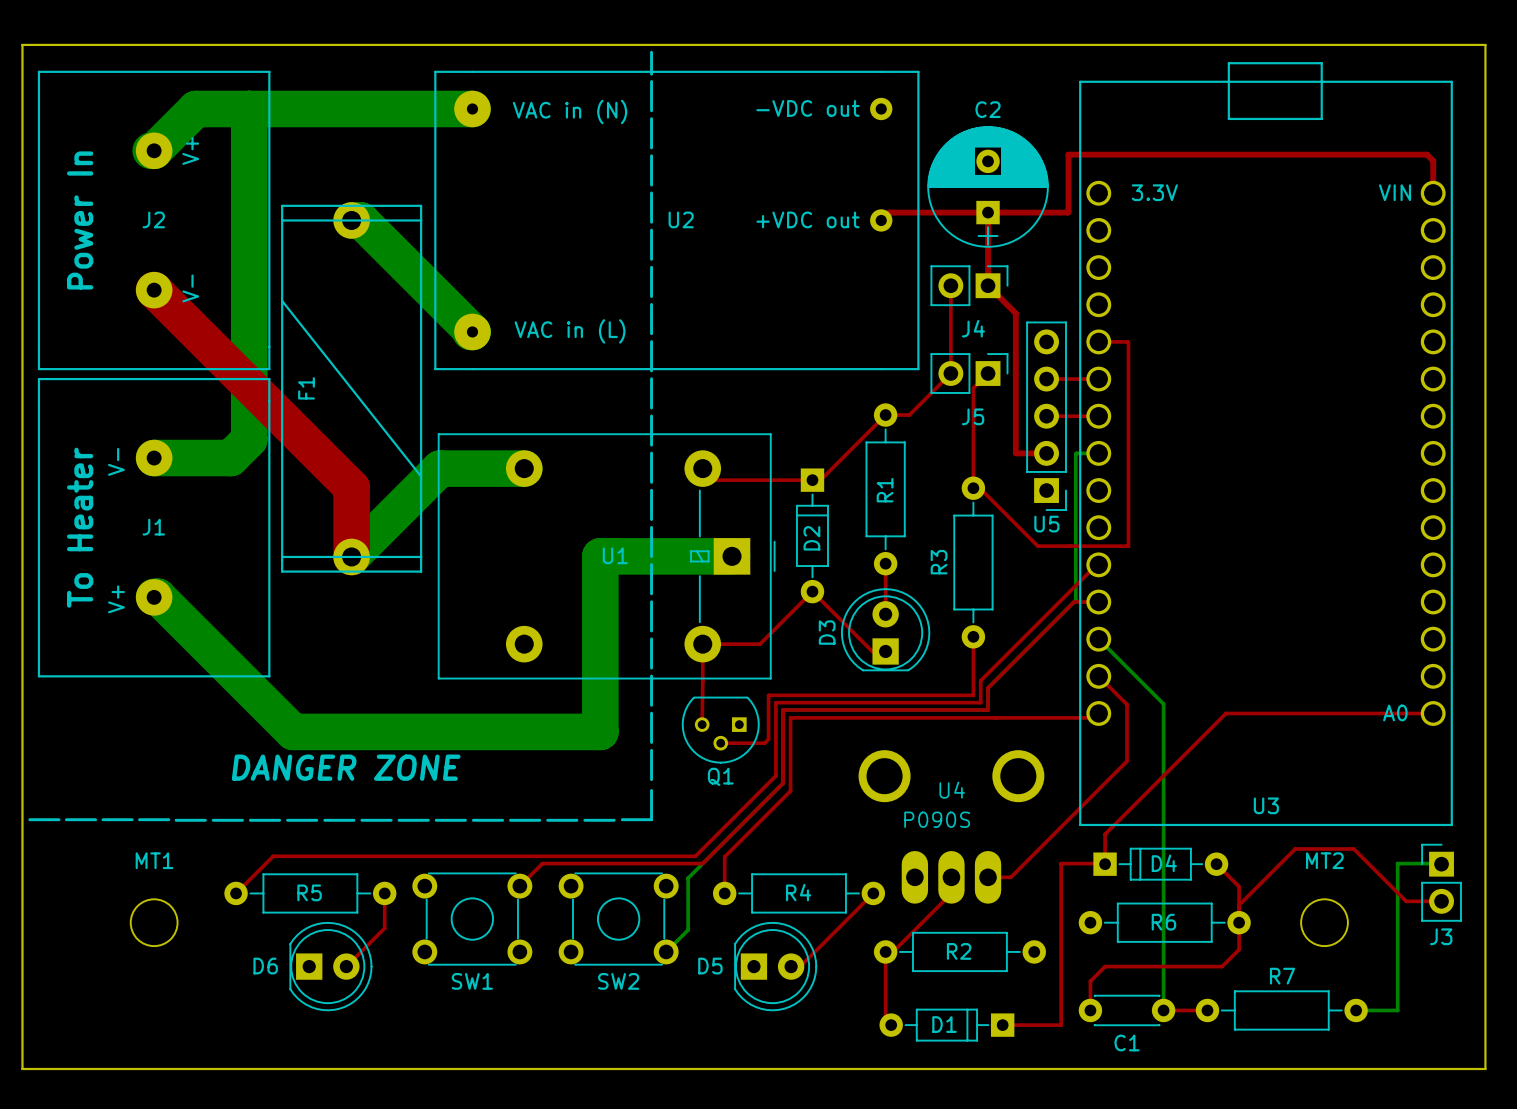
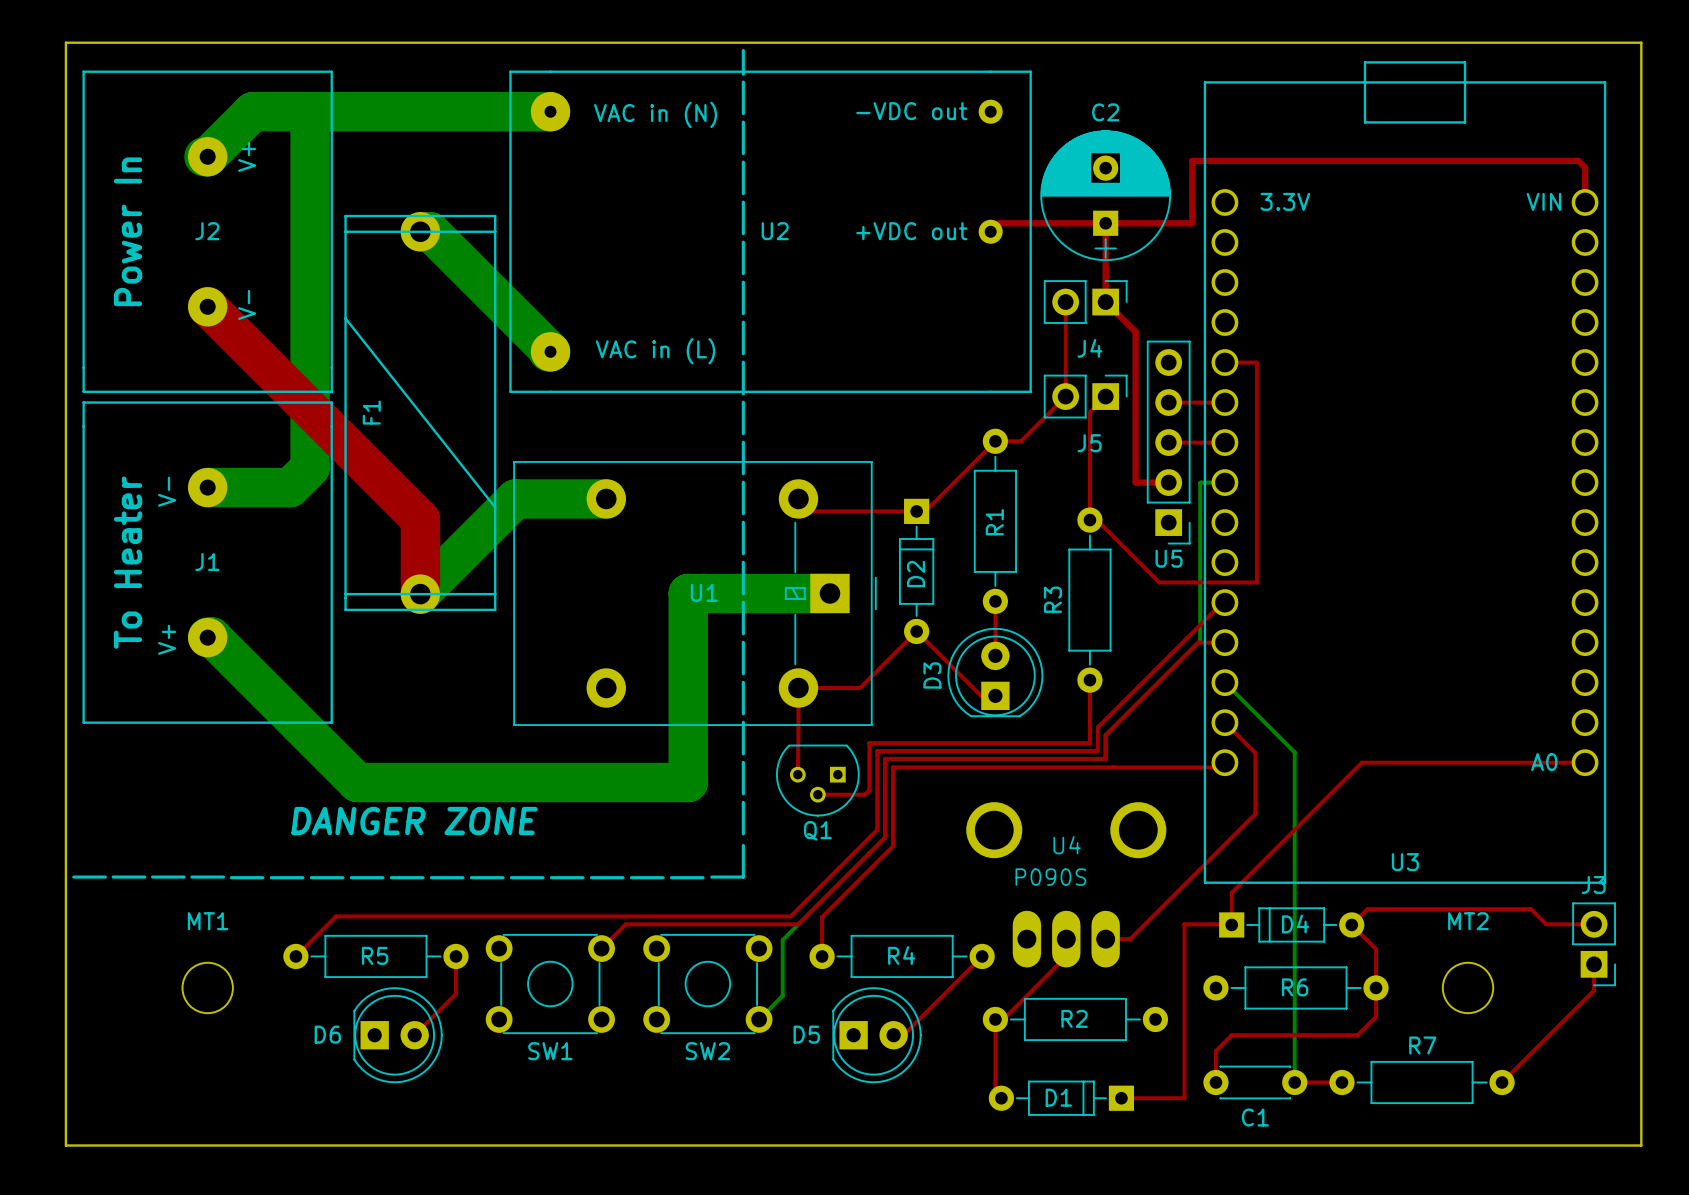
top track: none -> (1594, 924) (1546, 924) (1531, 909) (1367, 909) (1351, 924)
bottom track: (1441, 864) (1397, 863) (1397, 1010) (1356, 1010) -> none
J3 rotation: 0° (1441, 882) -> 180° (1594, 944)
top track: none -> (1594, 964) (1594, 990) (1502, 1082)
top track: (1441, 901) (1406, 901) (1353, 848) (1295, 848) (1239, 905) -> none

